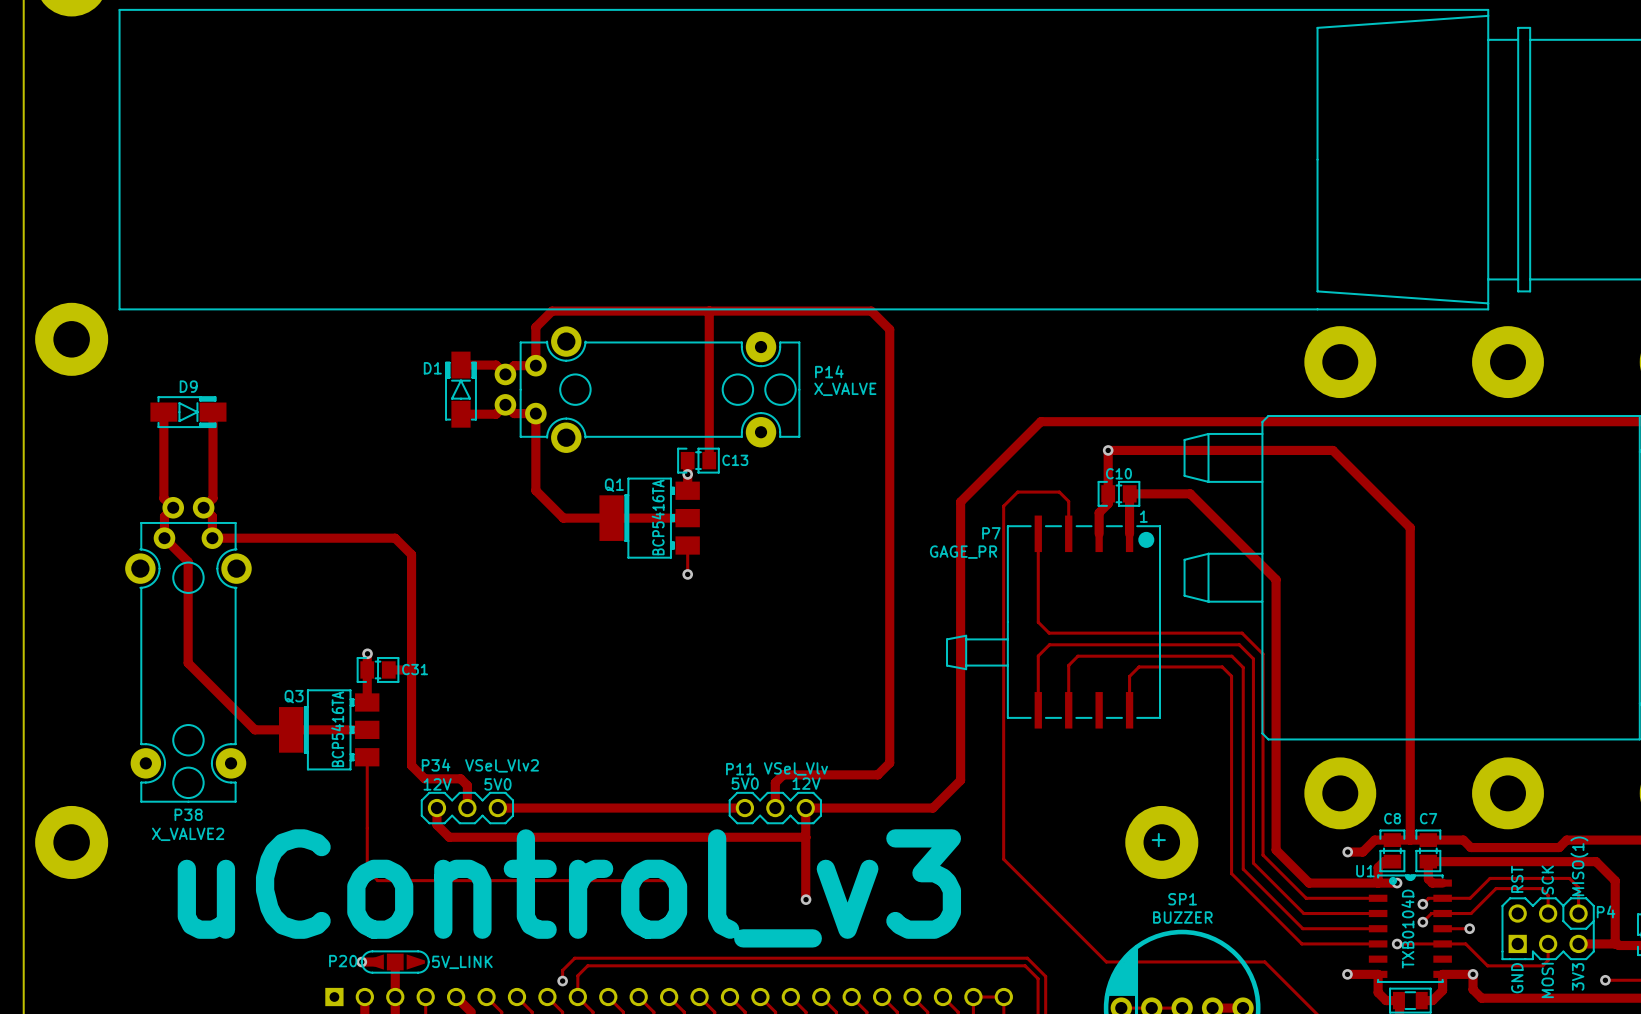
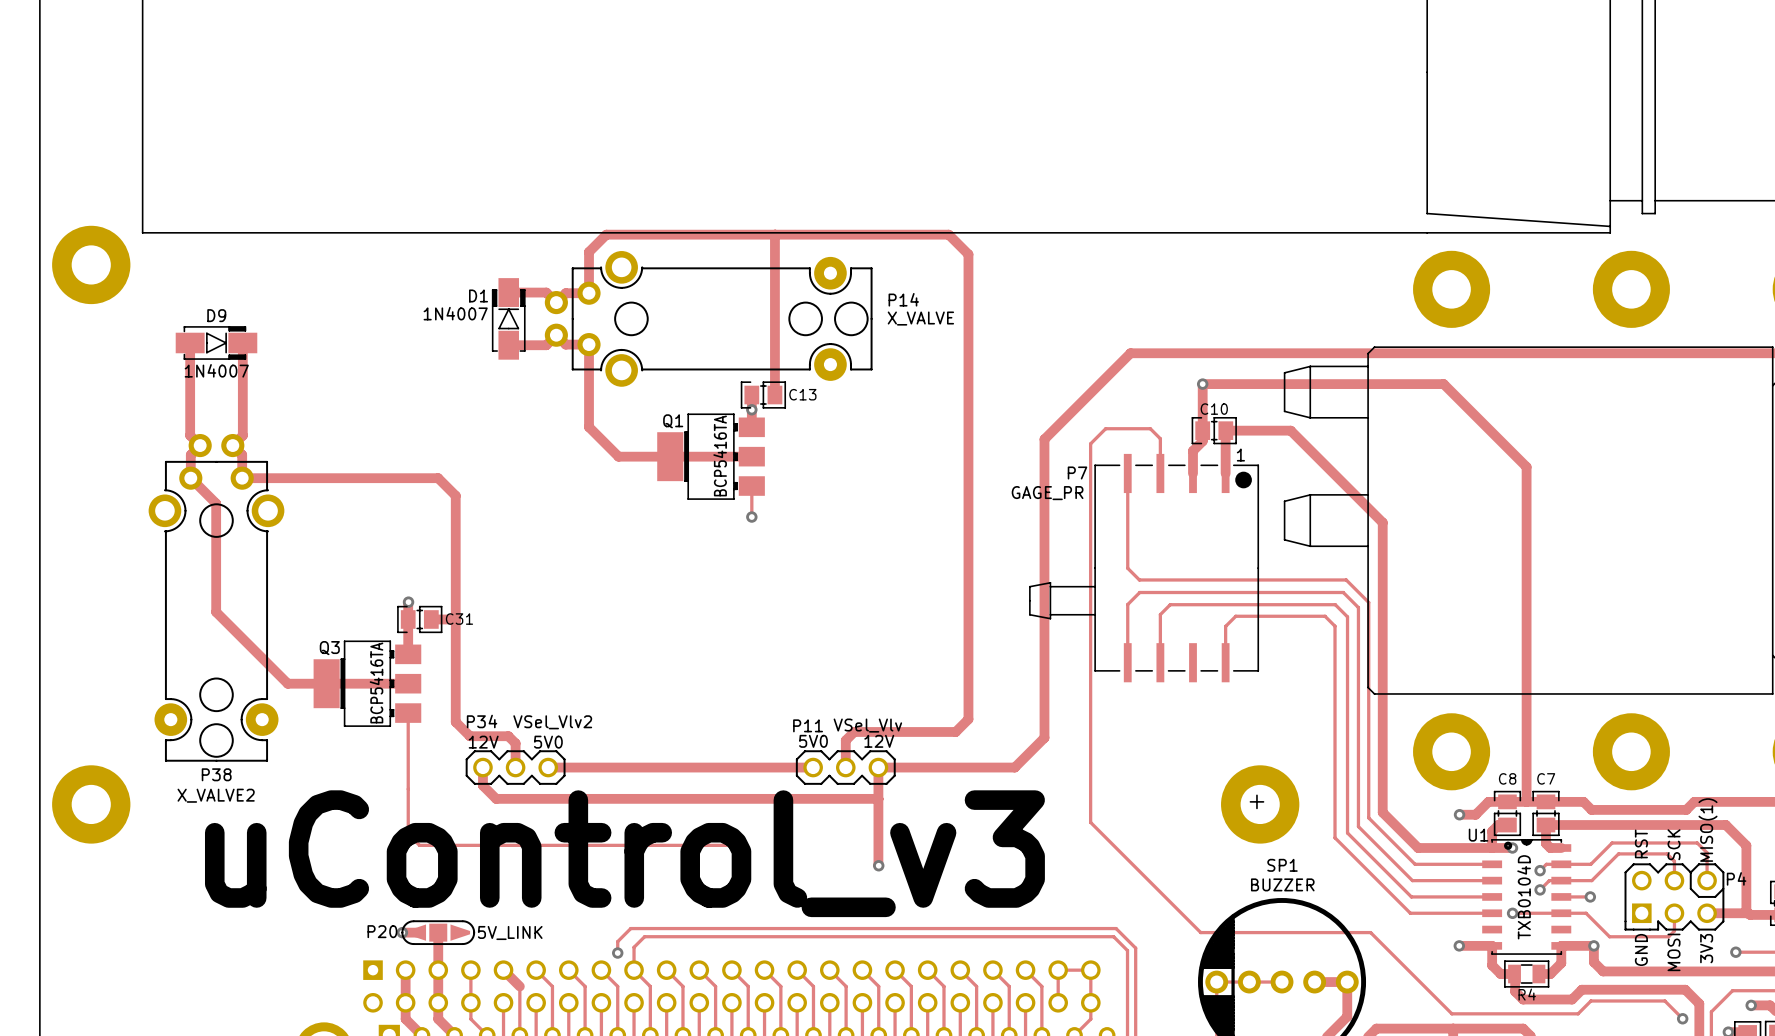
D1 value: none -> 1N4007 (455, 313)
D9 value: none -> 1N4007 (216, 370)

